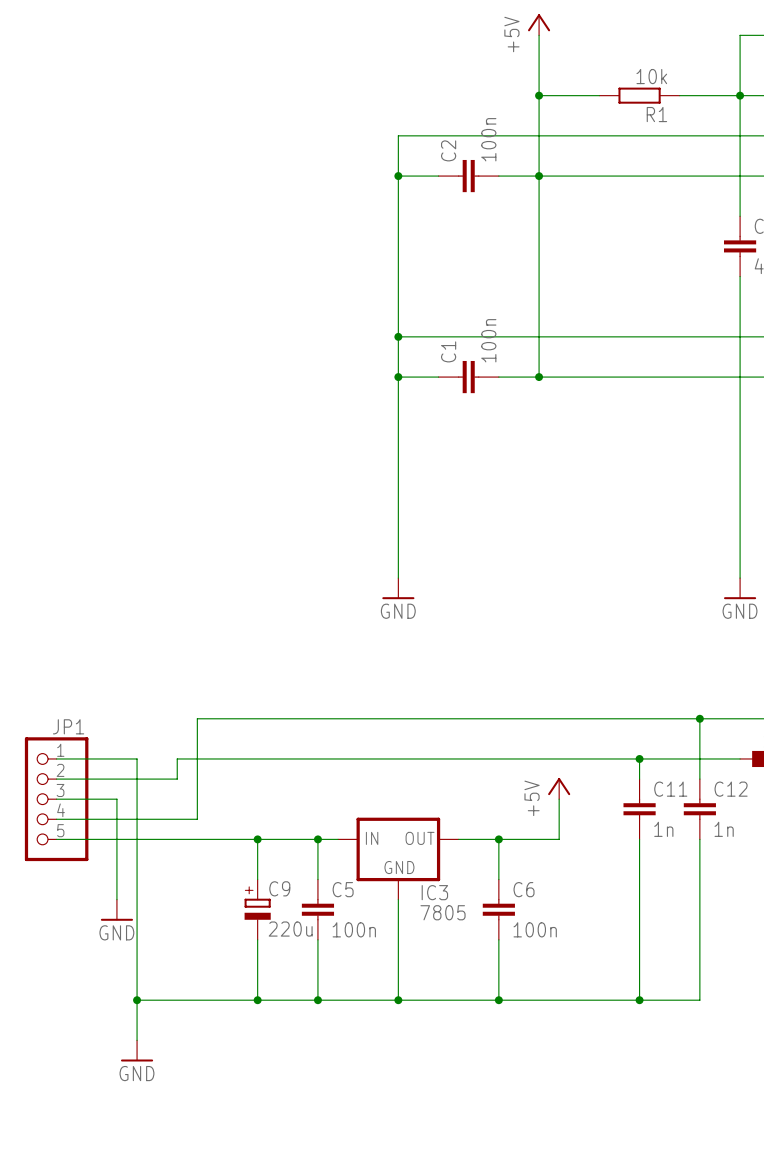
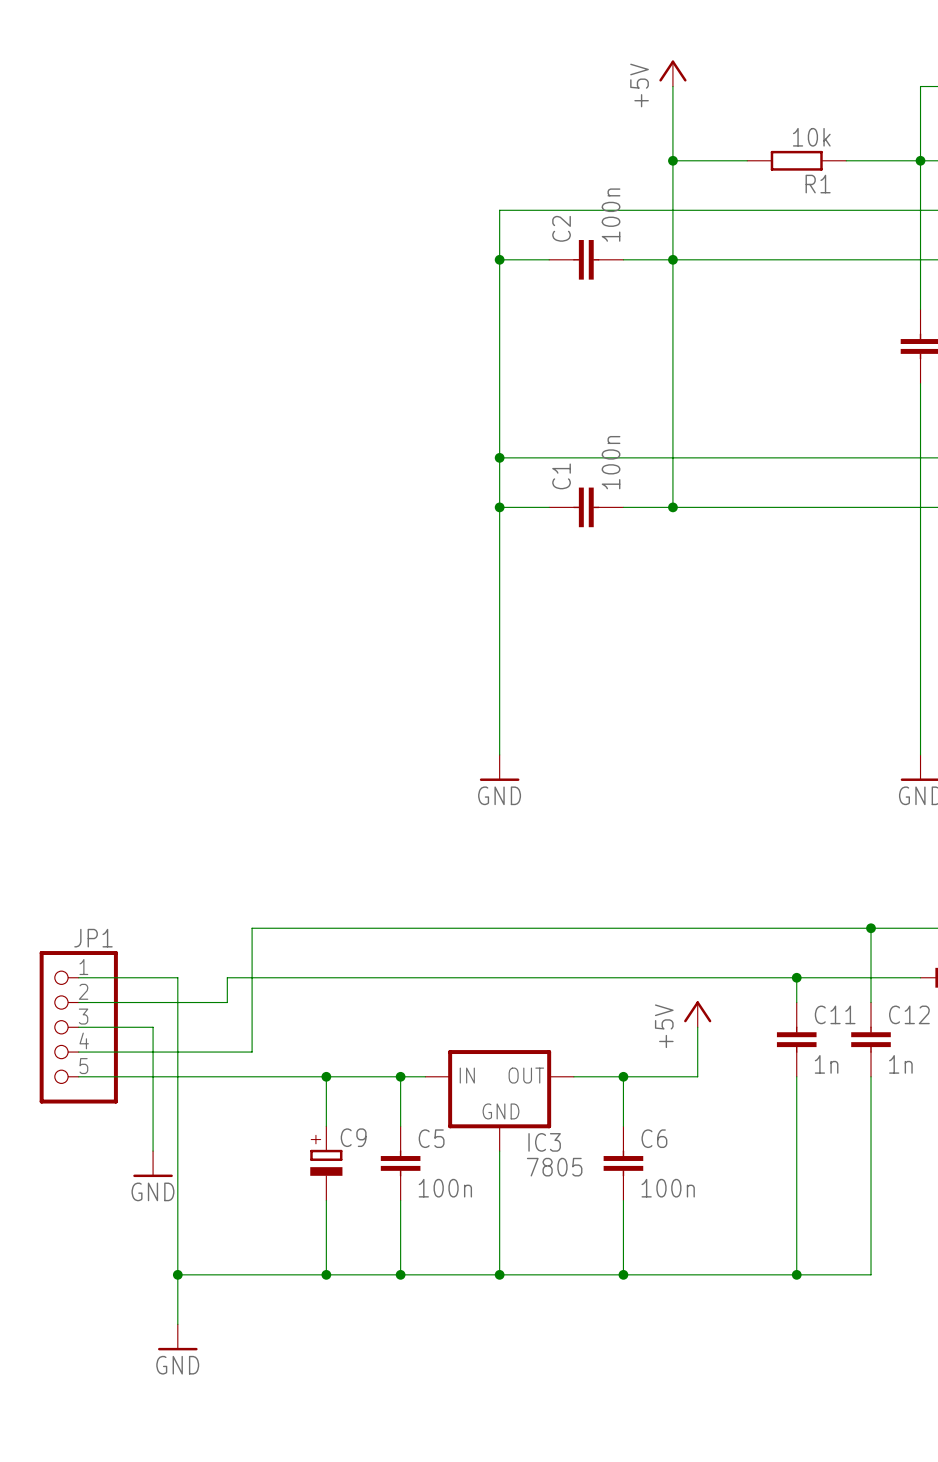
C9 value: 220u (290, 929) -> none

